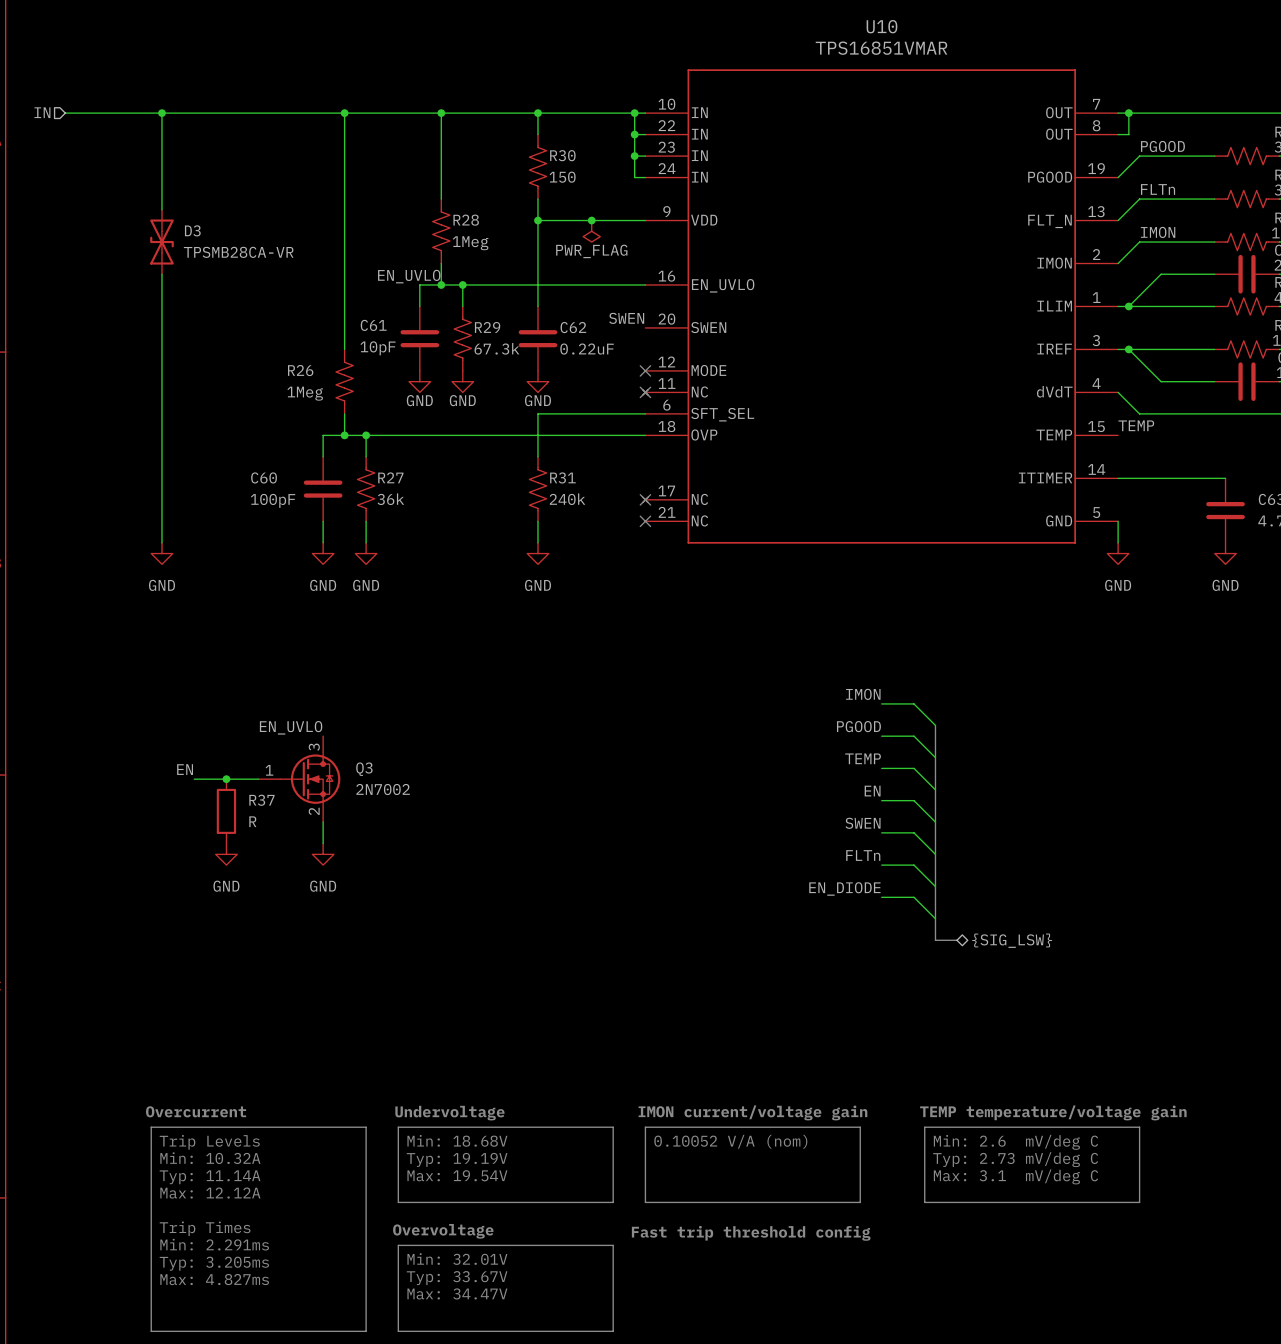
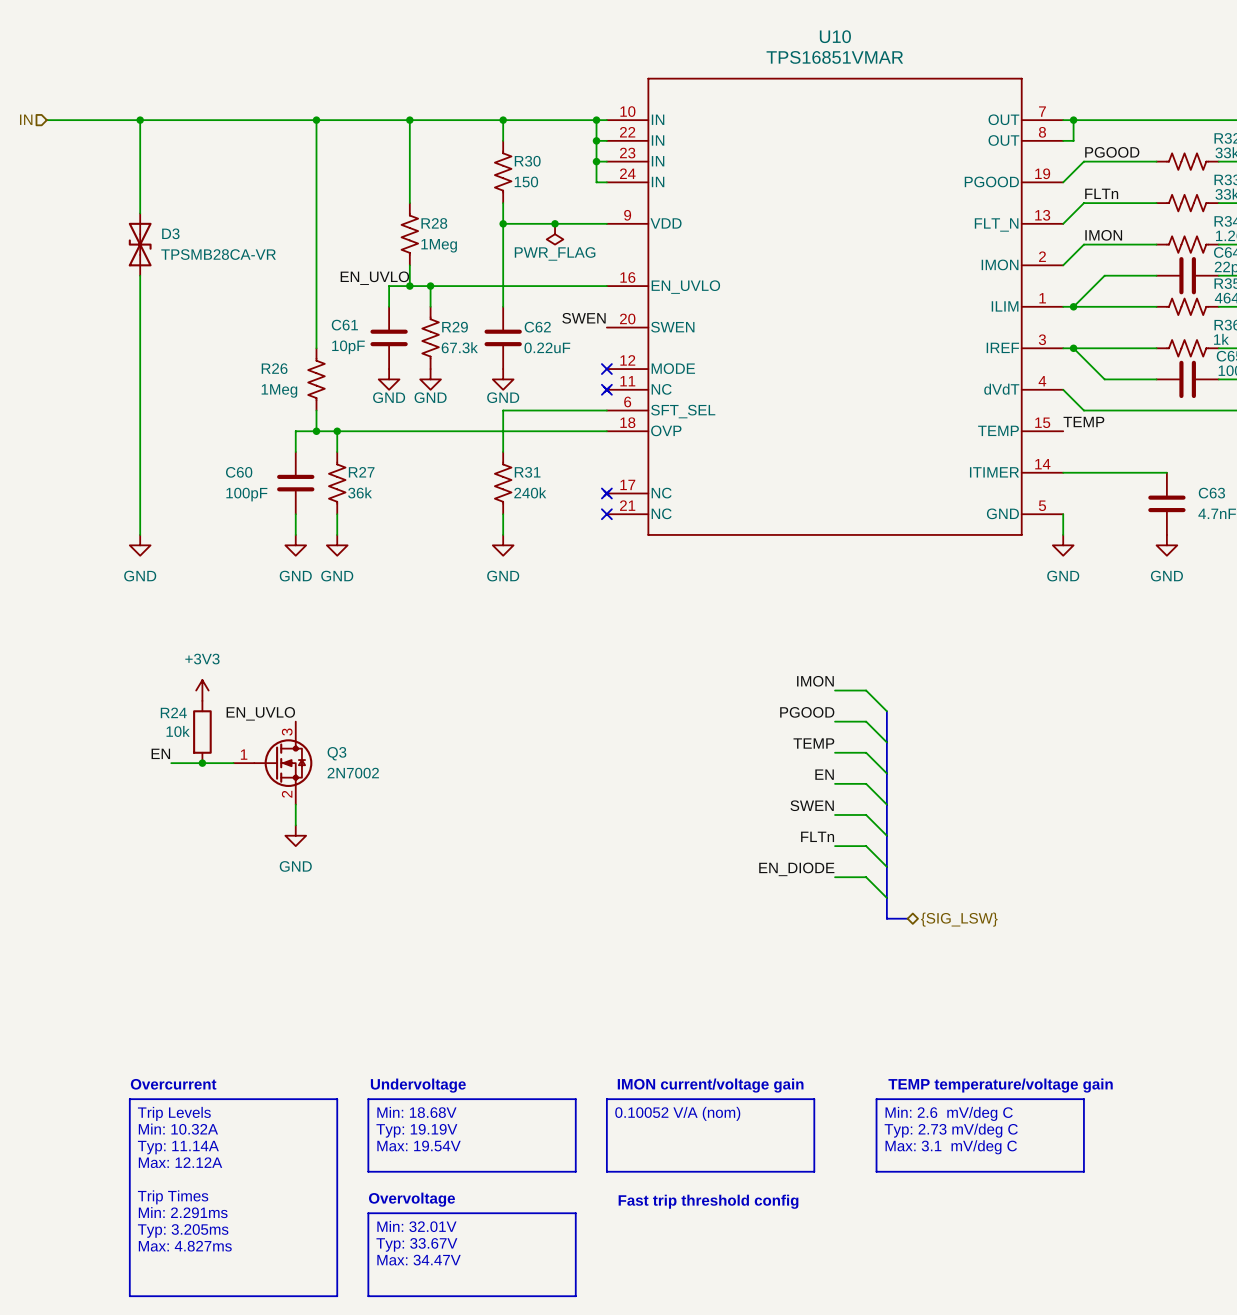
power symbol: none -> +3V3 (202, 690)
R24: none -> 10k (202, 732)
R37: R (226, 811) -> none
power symbol: GND (226, 854) -> none

